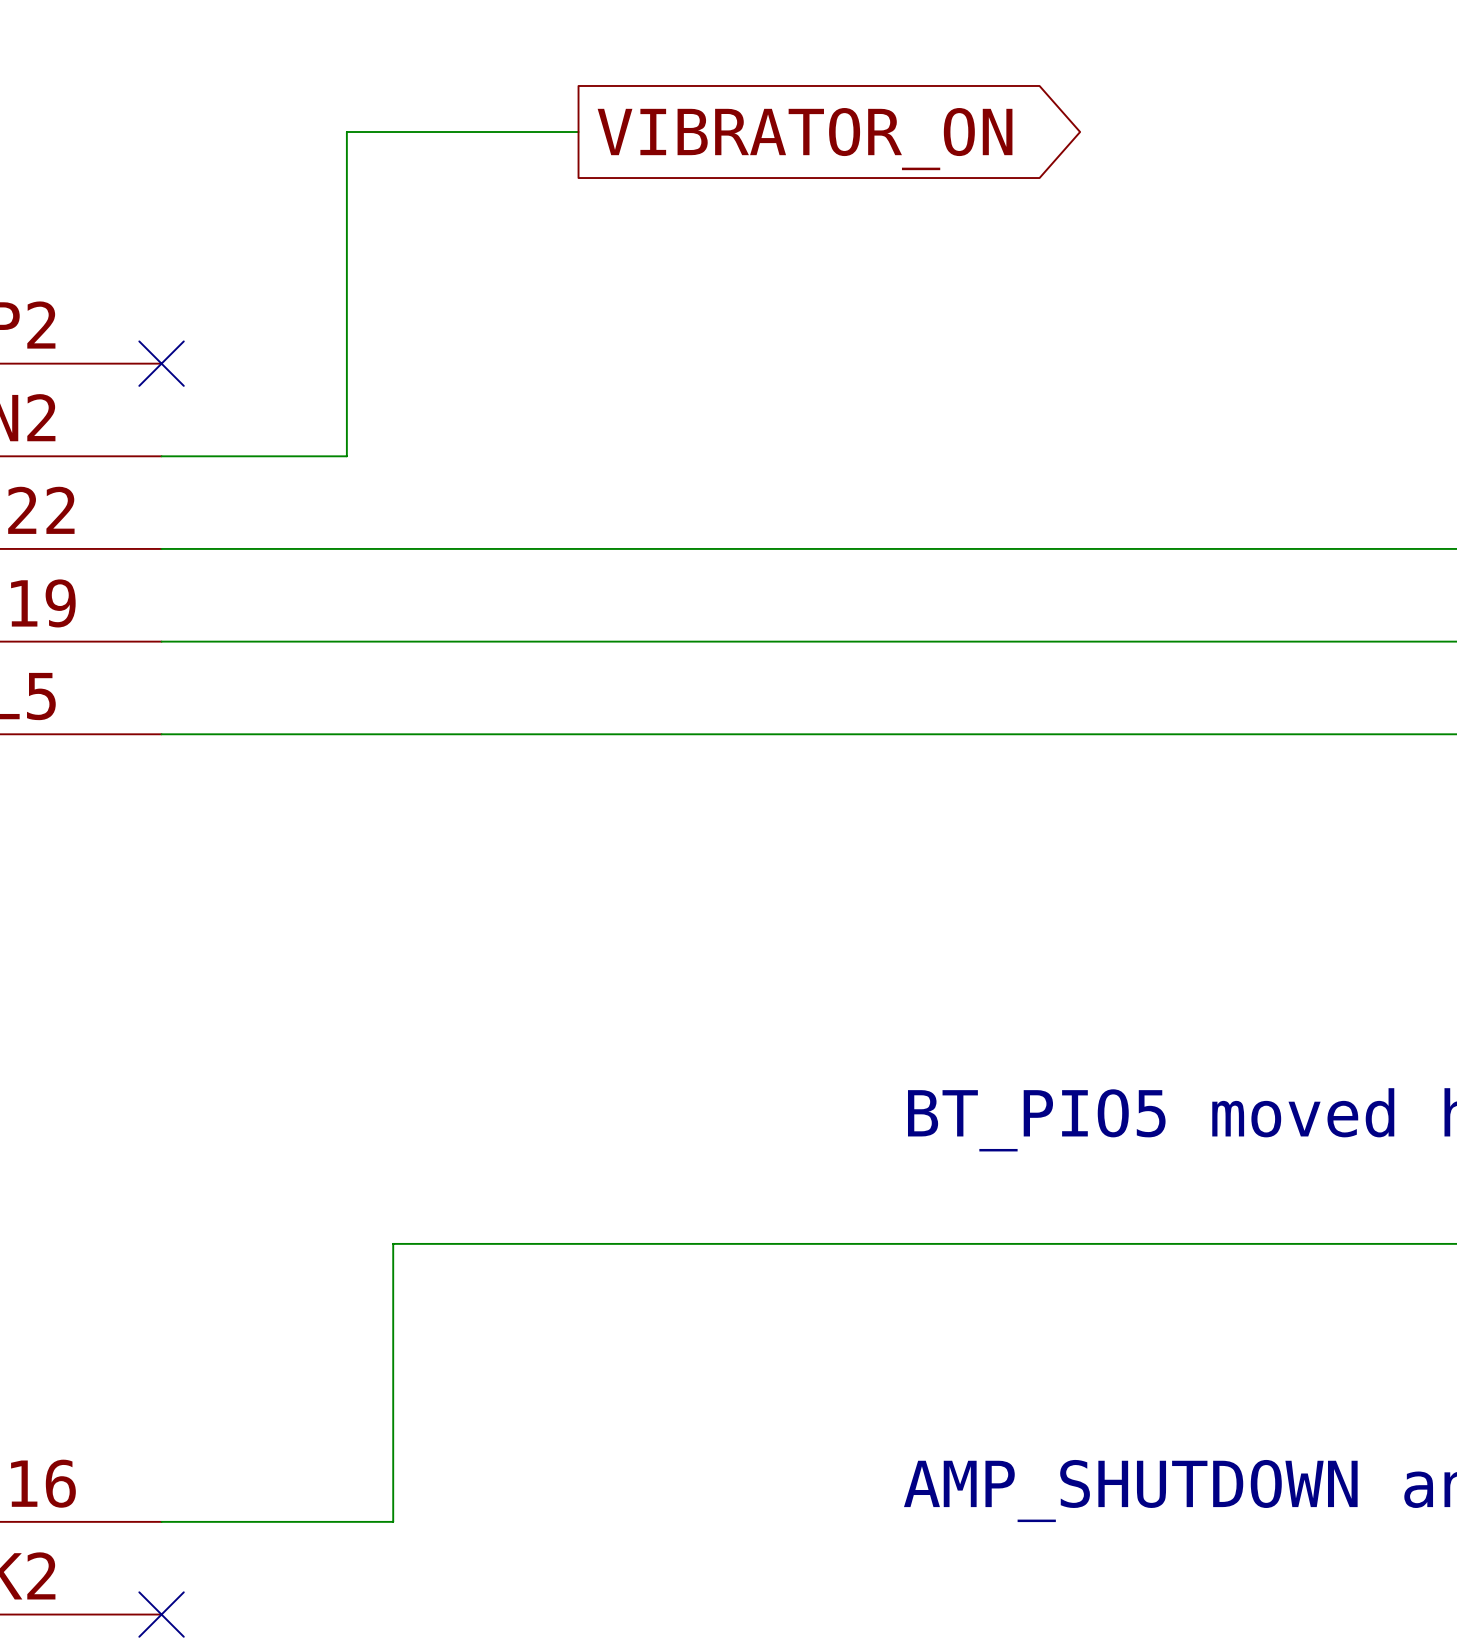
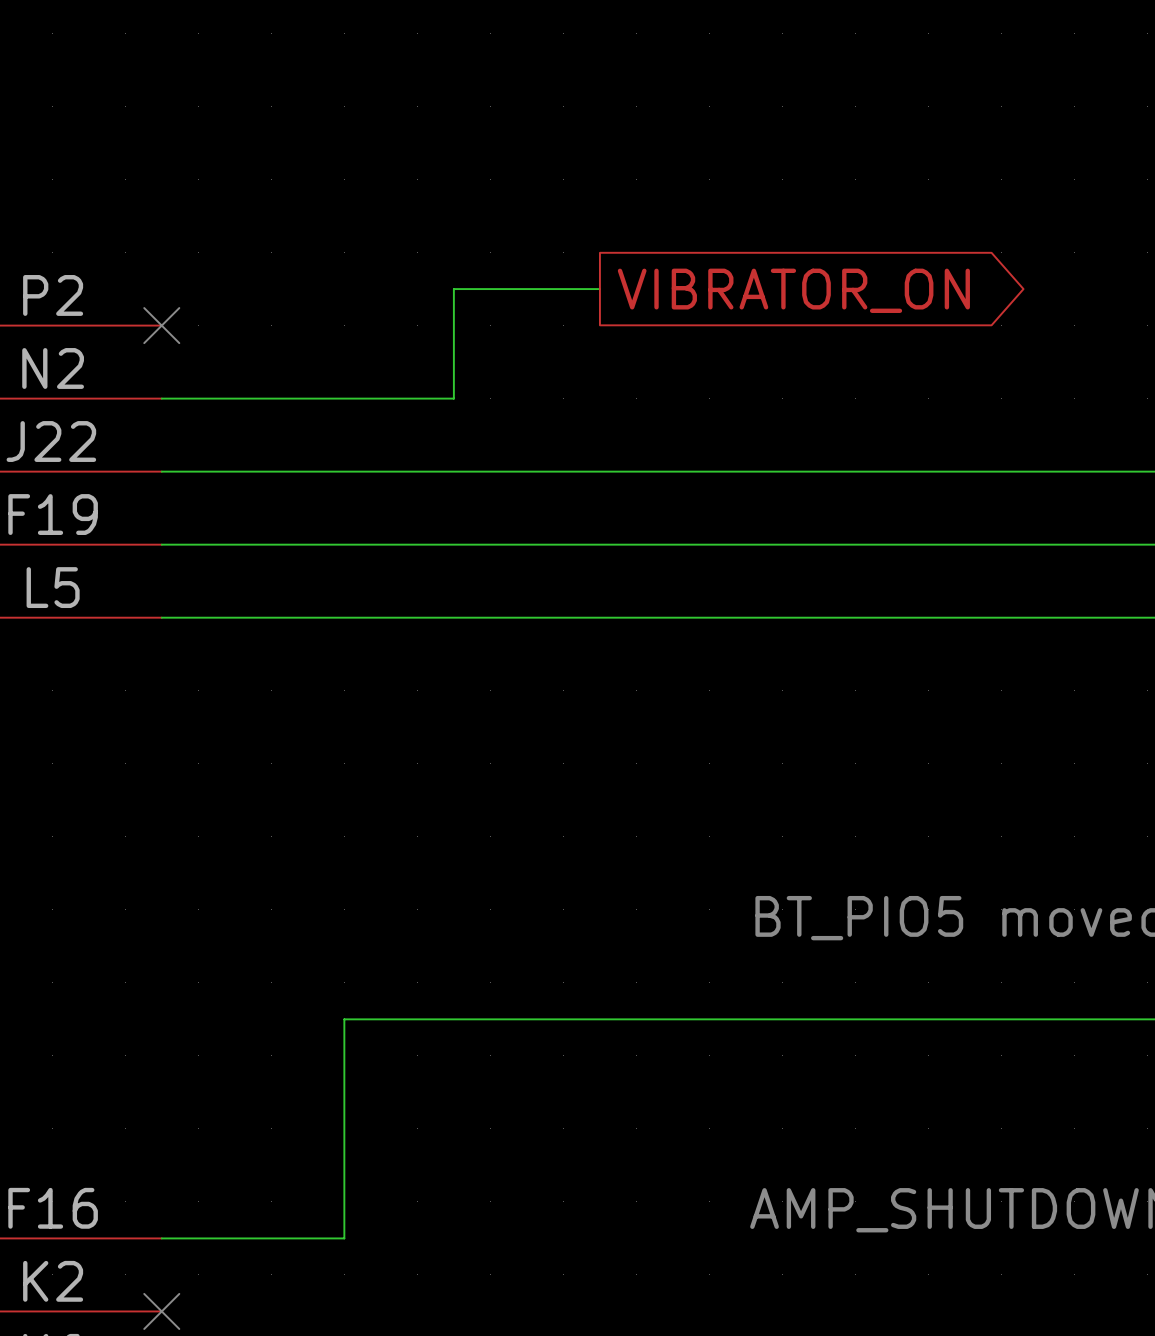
wire: (578, 132) (346, 132) (346, 456) -> (599, 289) (453, 289) (453, 398) (307, 398)
global label position: VIBRATOR_ON (805, 139) -> VIBRATOR_ON (793, 290)

